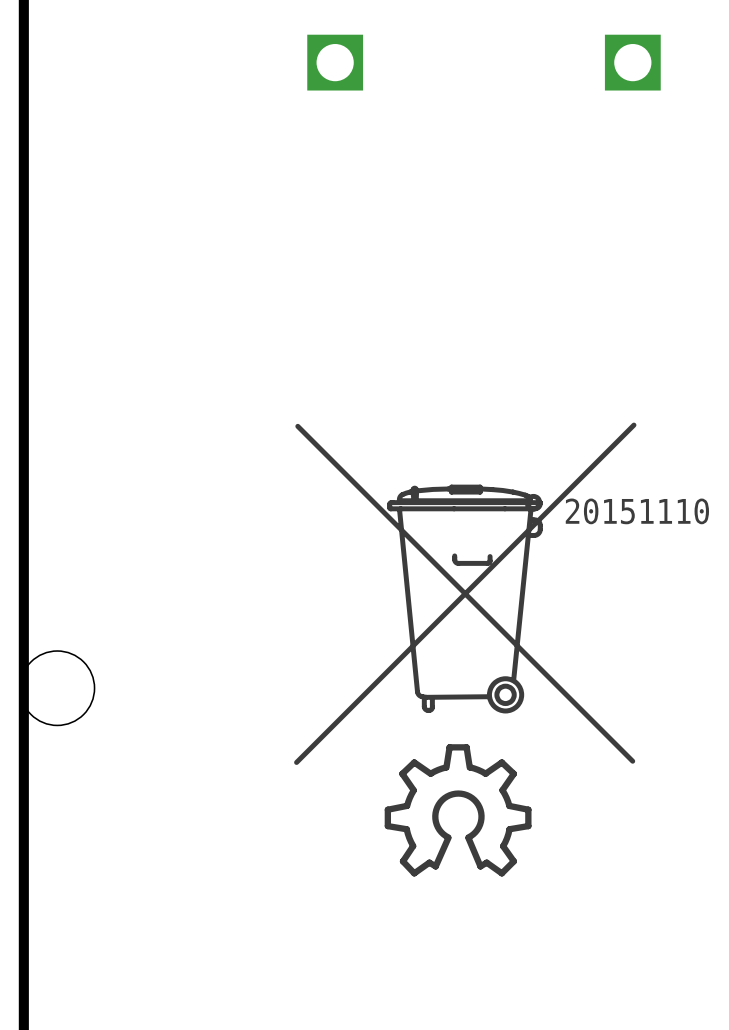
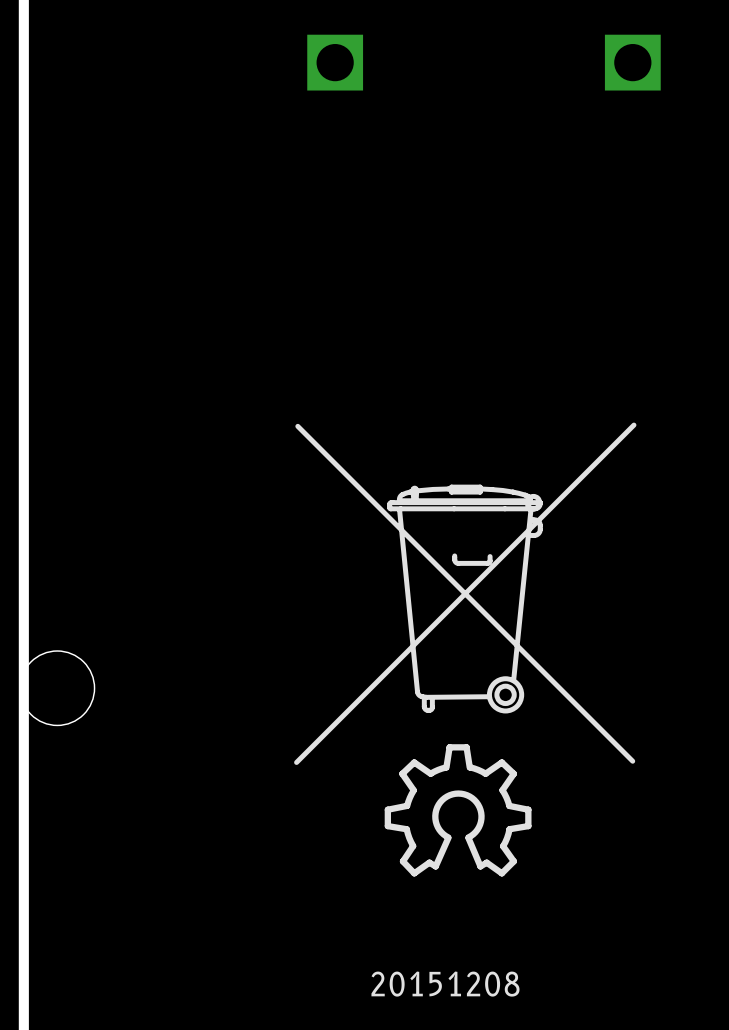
text: 20151110 (637, 511) -> none
text: none -> 20151208 (445, 984)

